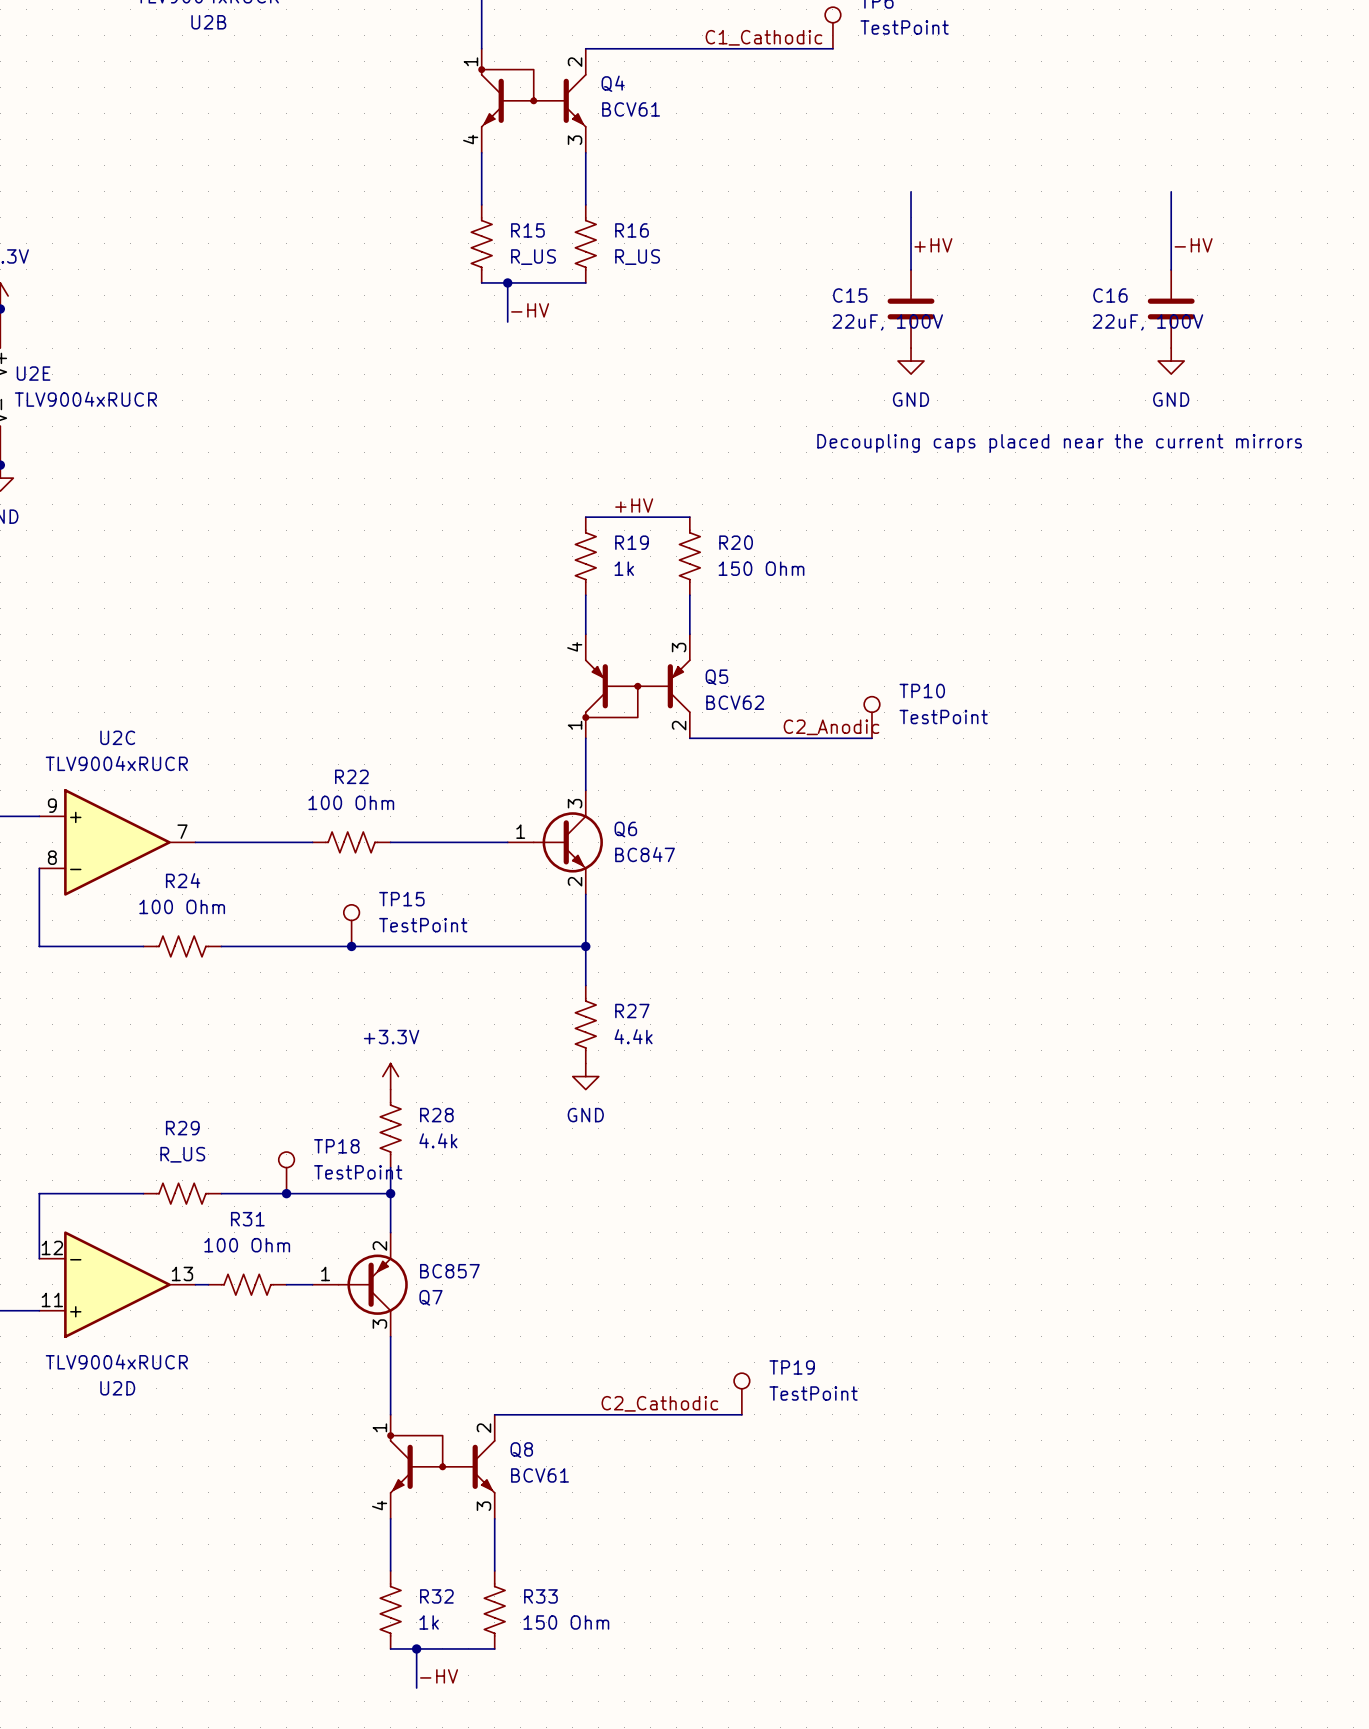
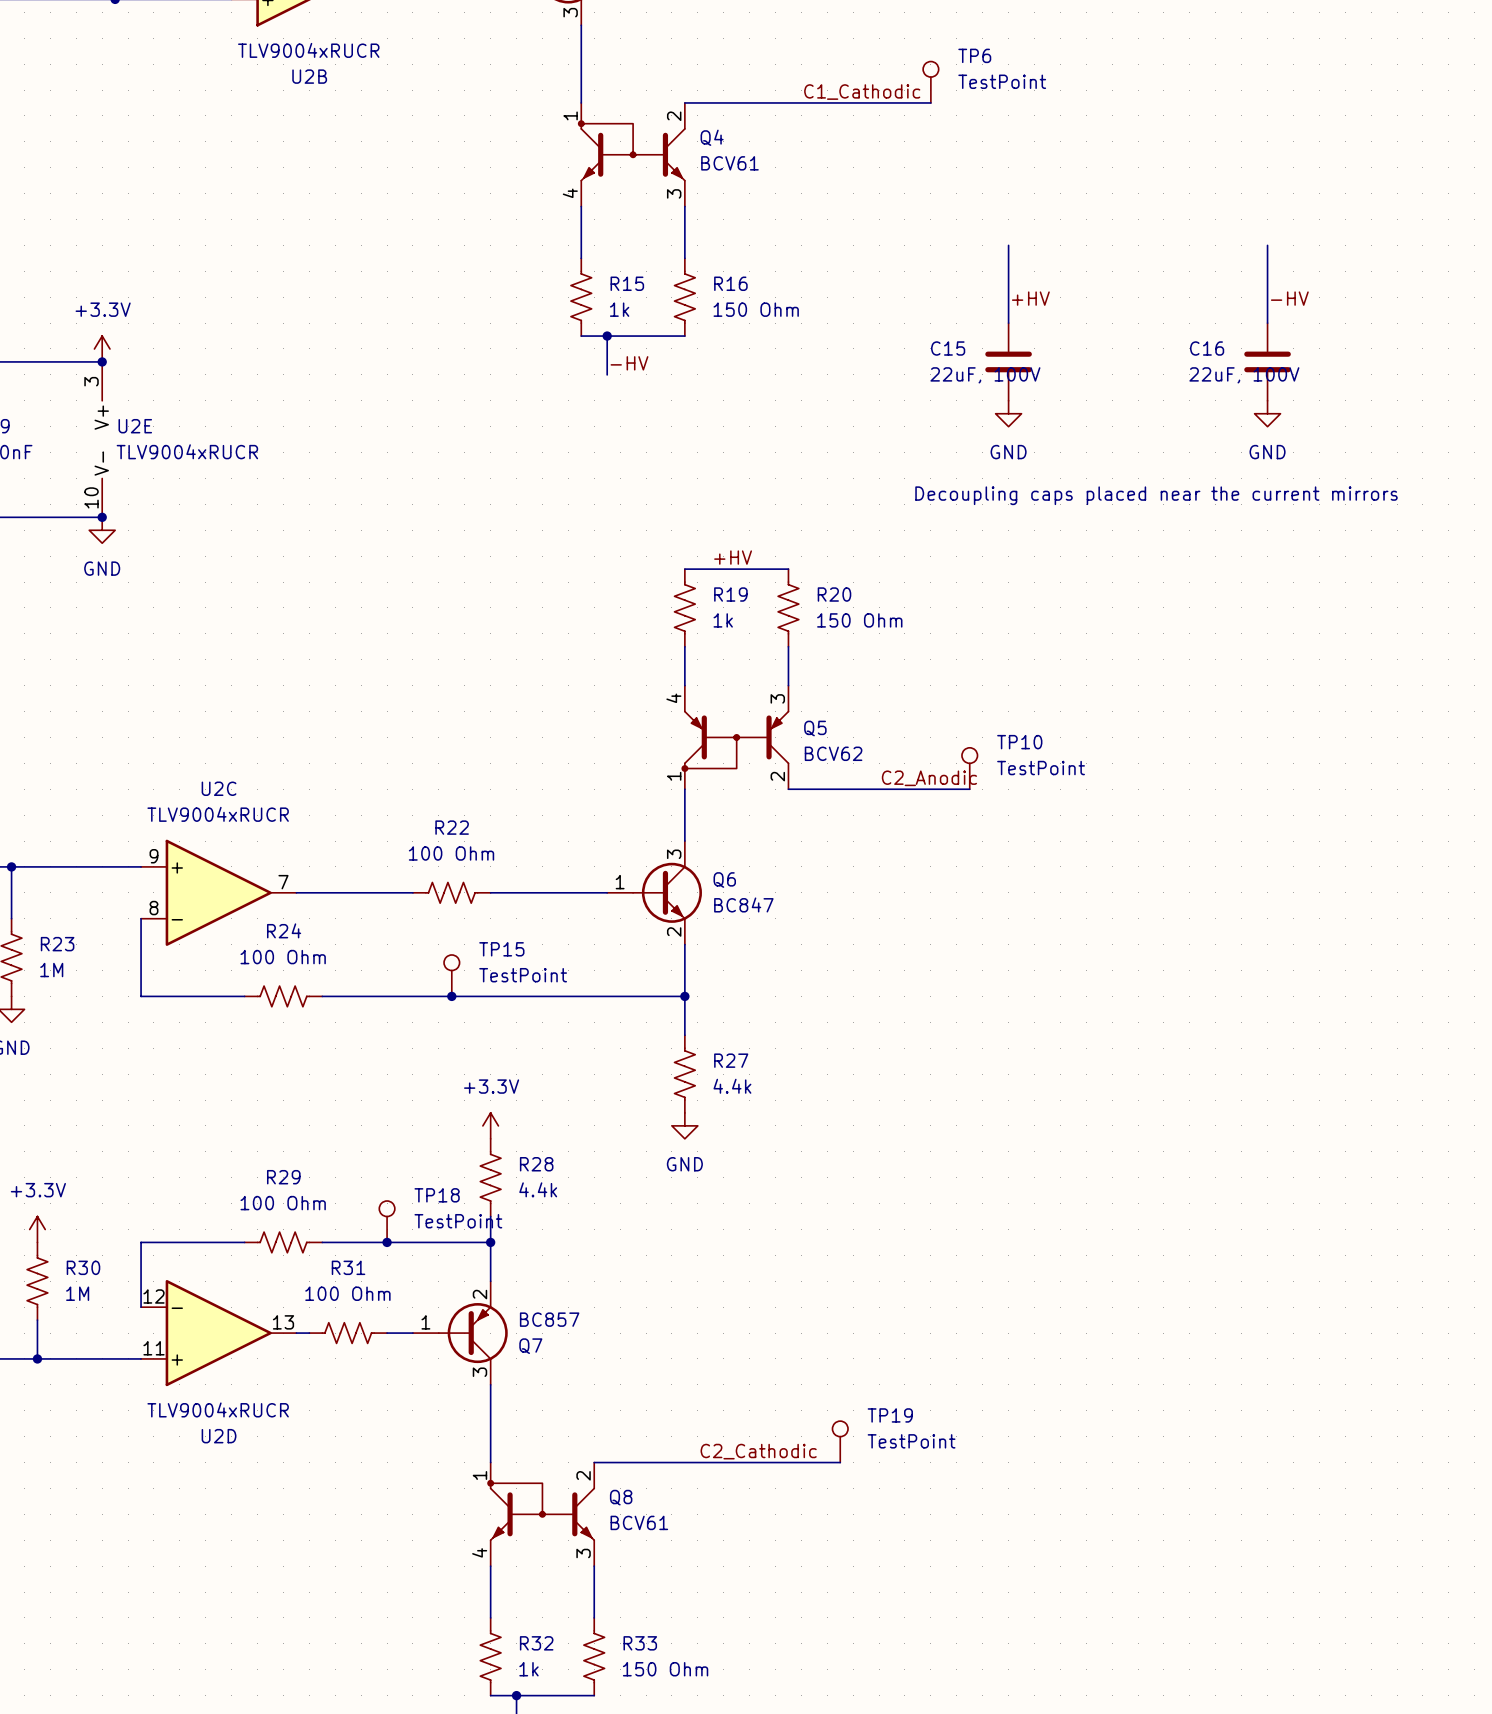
R15 value: R_US (533, 257) -> 1k (619, 309)
R16 value: R_US (637, 257) -> 150 Ohm (756, 309)
R29 value: R_US (182, 1154) -> 100 Ohm (283, 1203)

